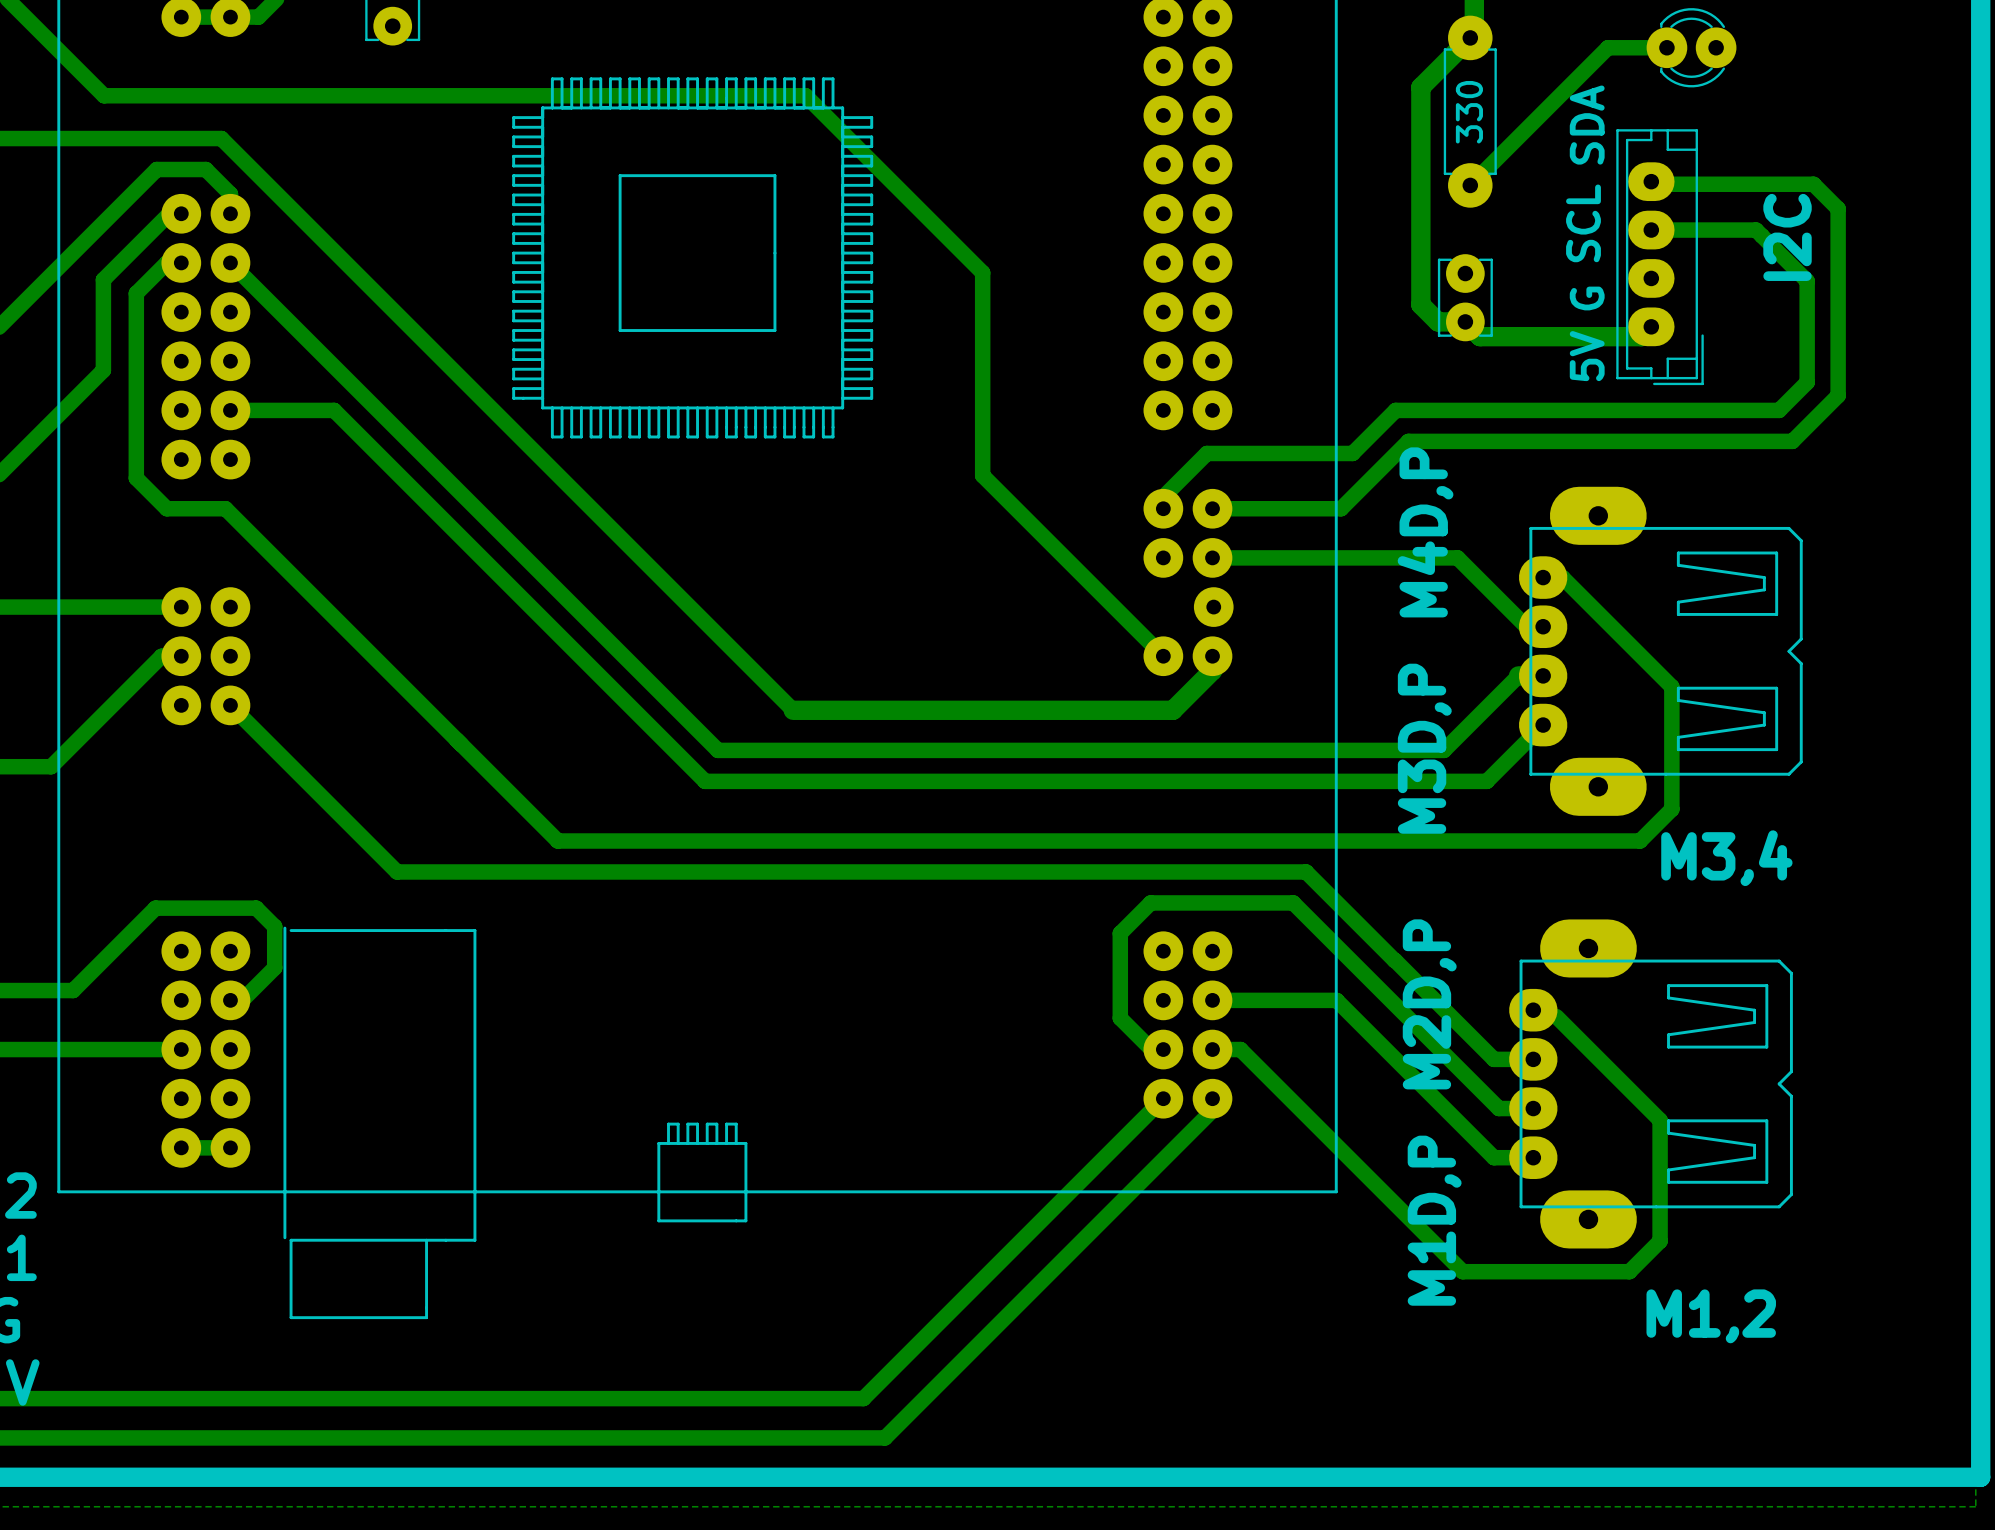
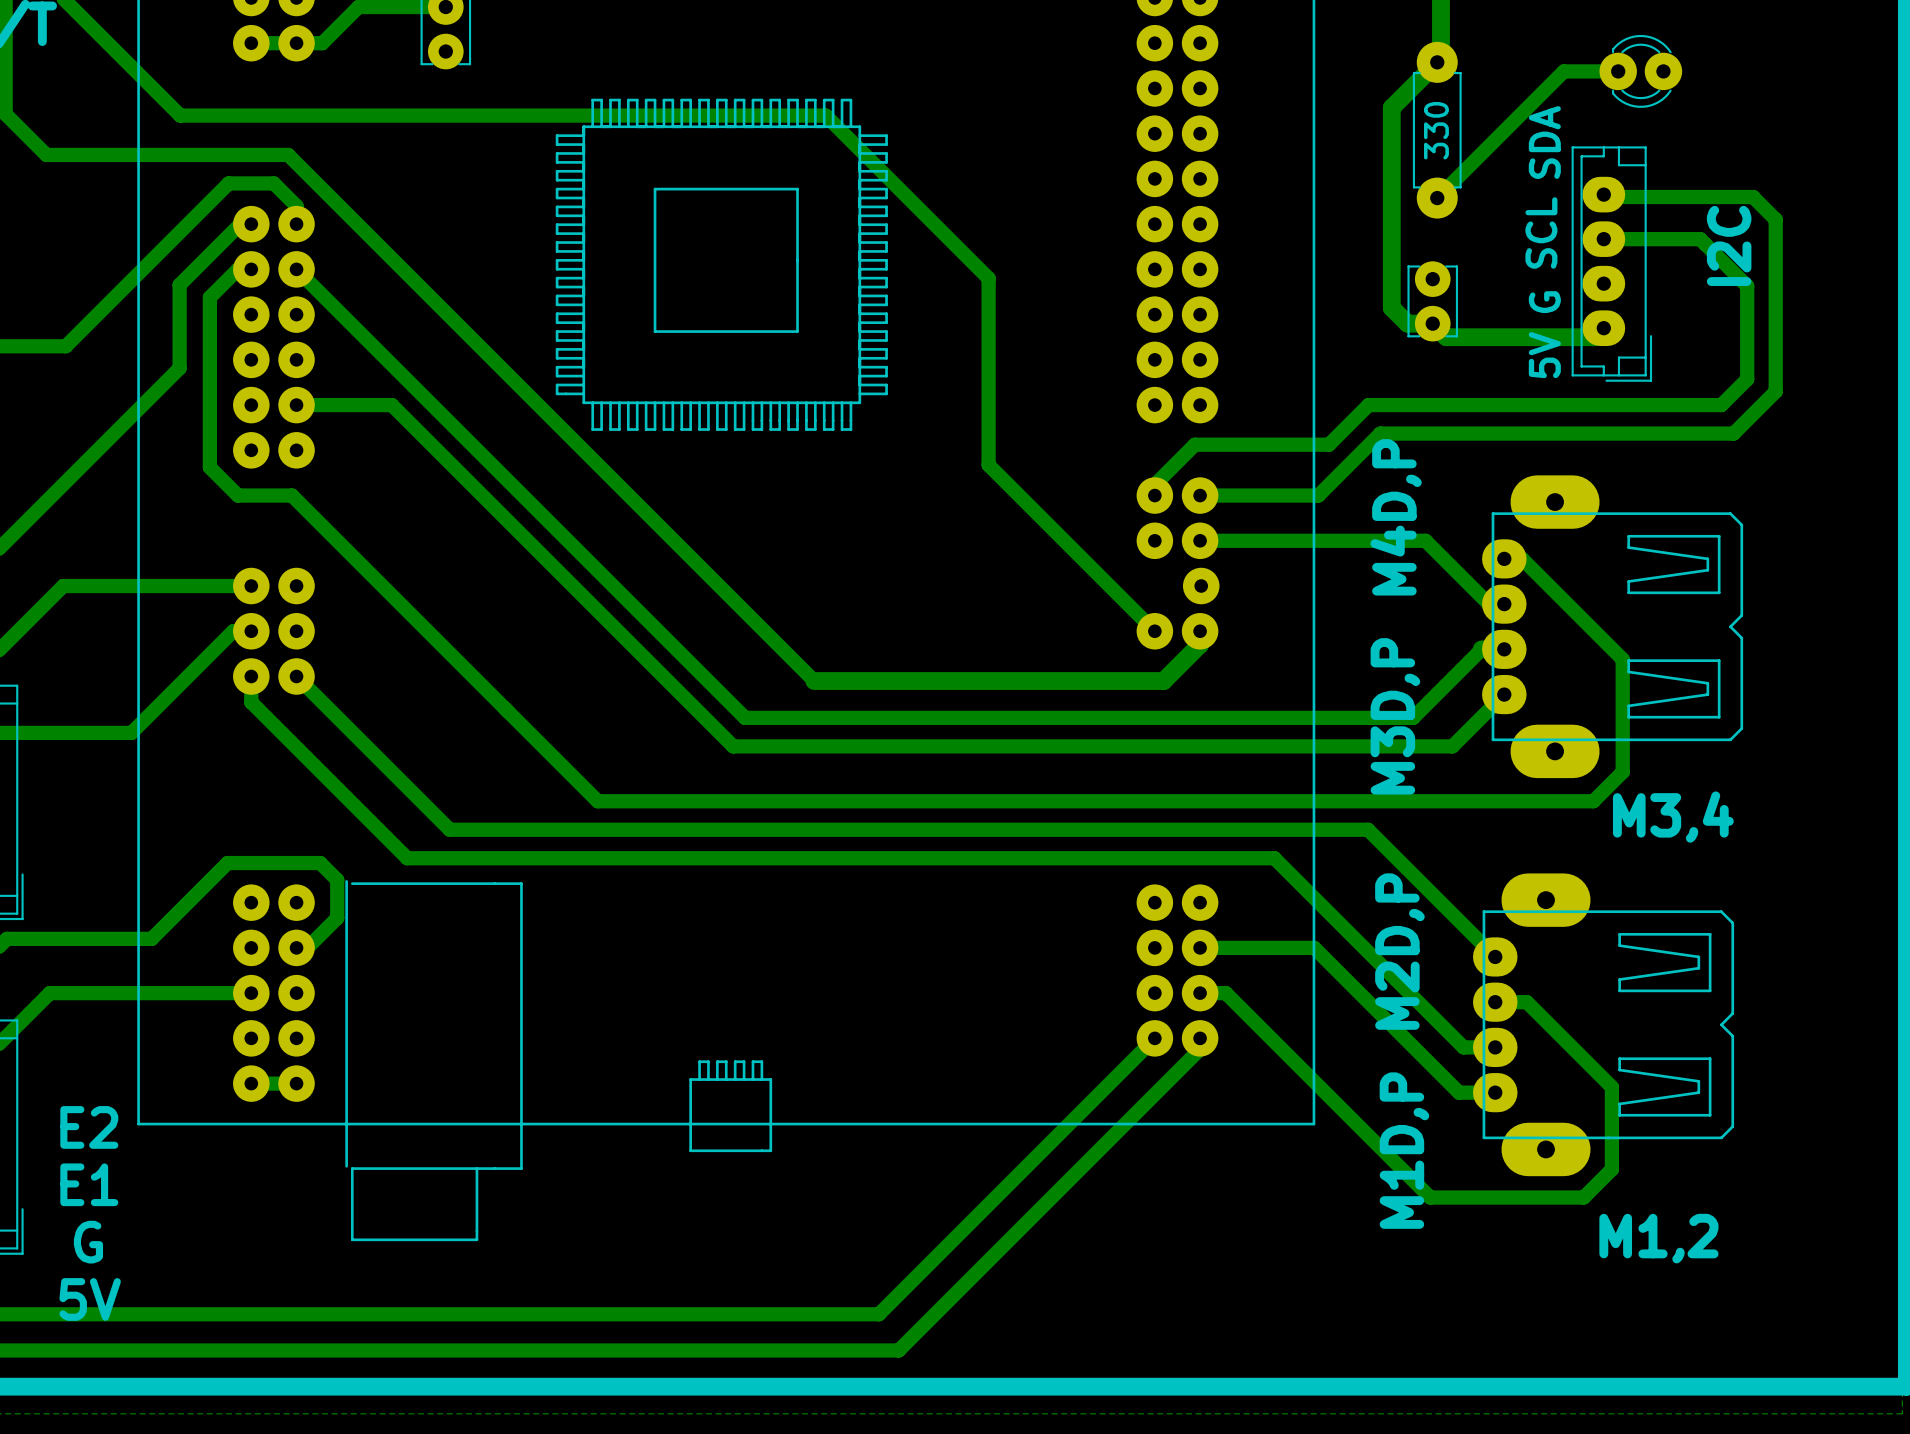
bottom track: (1306, 871) (1493, 1059) (1533, 1059) -> (1286, 829) (1368, 829) (1495, 956)
bottom track: (1150, 902) (1120, 933) (1120, 1018) (1151, 1049) (1163, 1049) -> (1143, 858) (407, 858) (251, 702) (251, 676)
bottom track: (1556, 1016) (1660, 1120) (1660, 1151) -> (1495, 1002) (1526, 1002) (1611, 1087)

